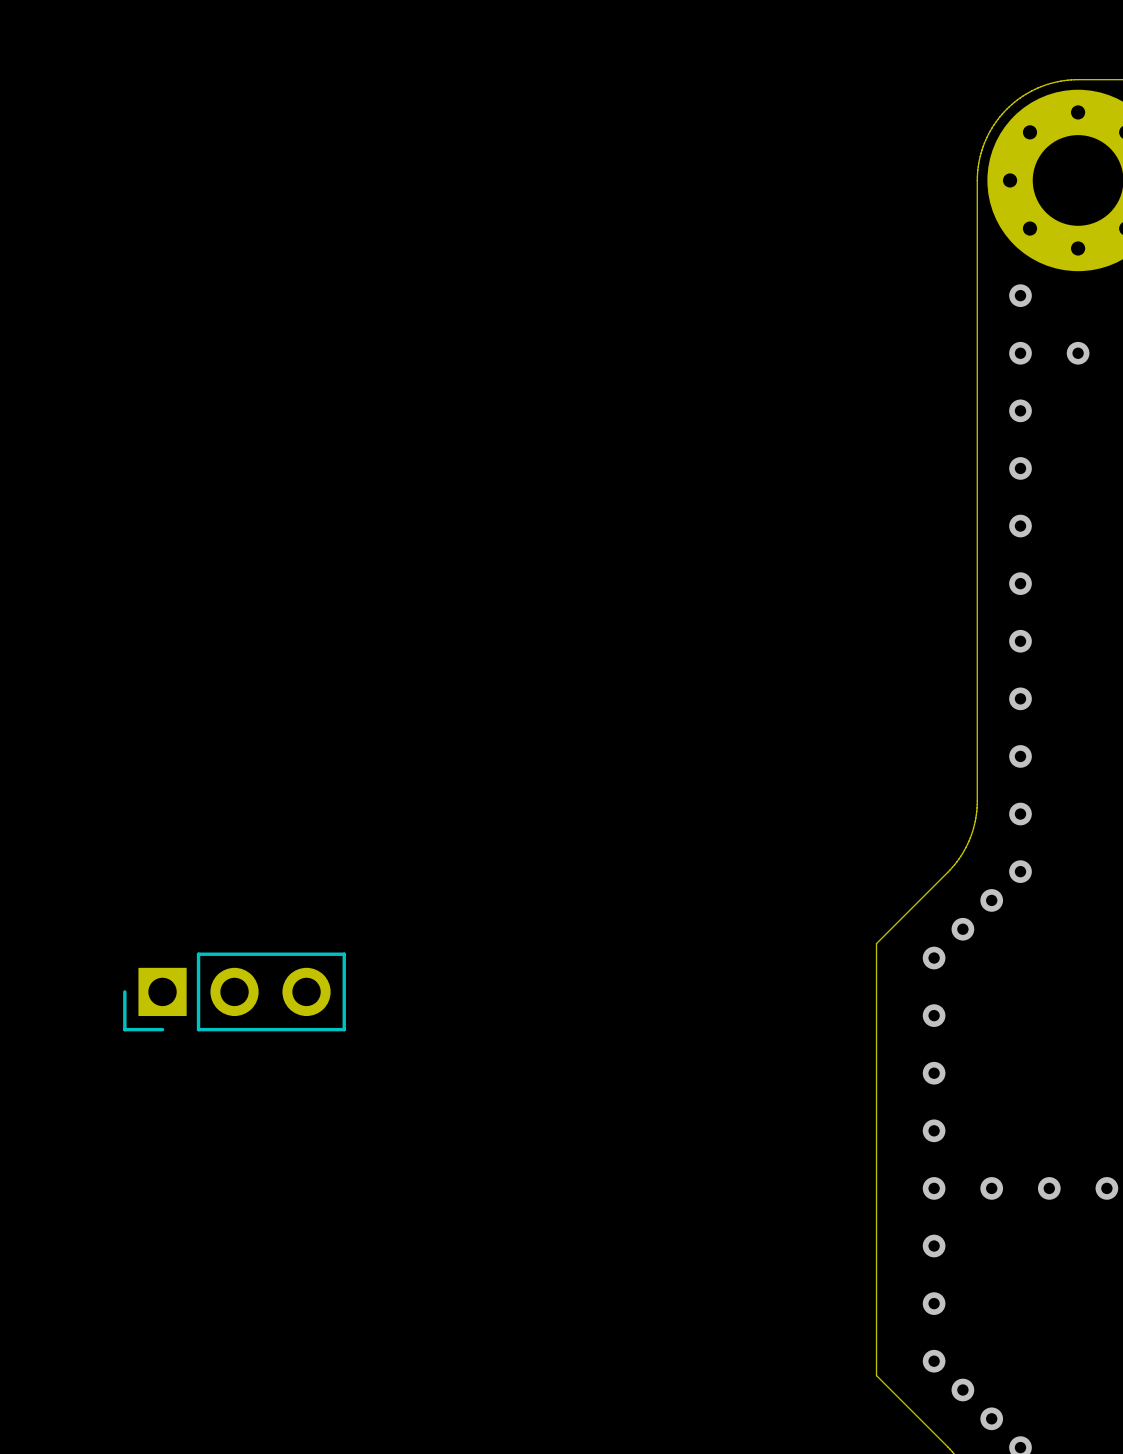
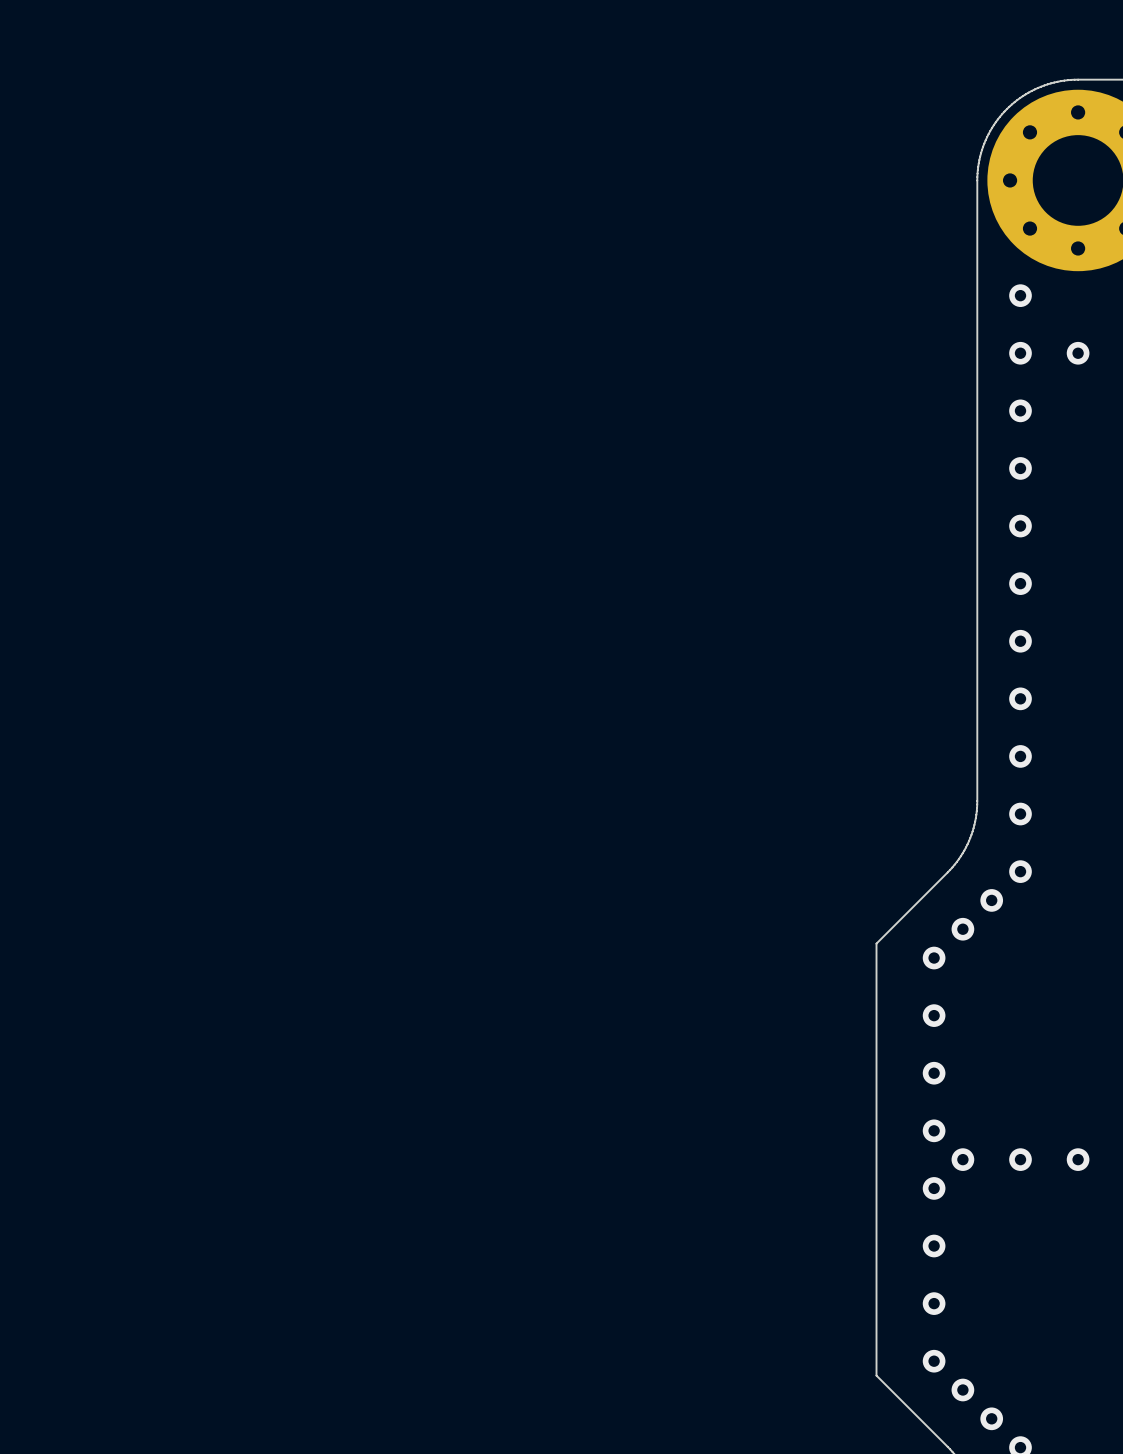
part: (234, 991) -> none
via: none -> (962, 1159)
via: none -> (1020, 1159)
via: none -> (1078, 1159)
via: (991, 1188) -> none
via: (1049, 1188) -> none
via: (1106, 1188) -> none

